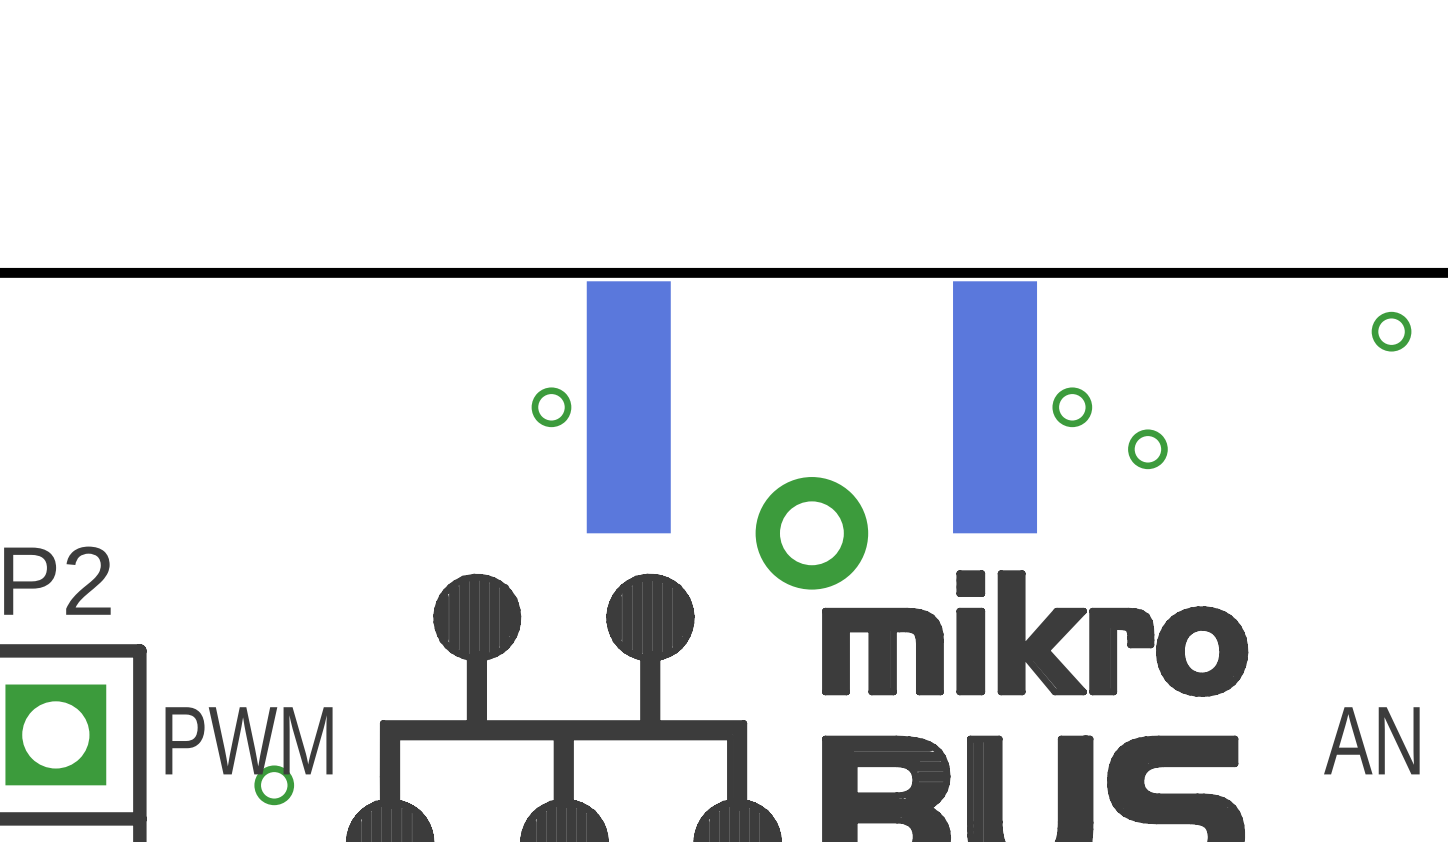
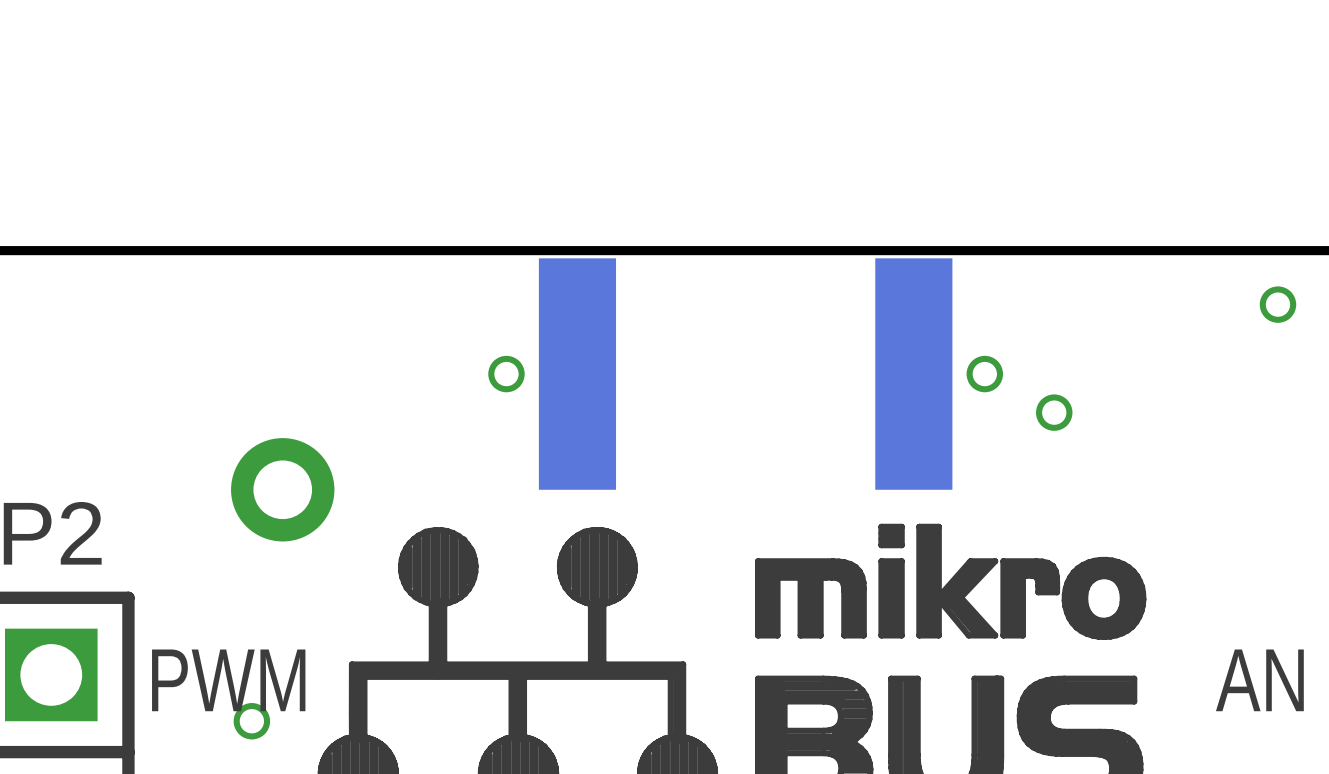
part position: (811, 533) -> (282, 489)

